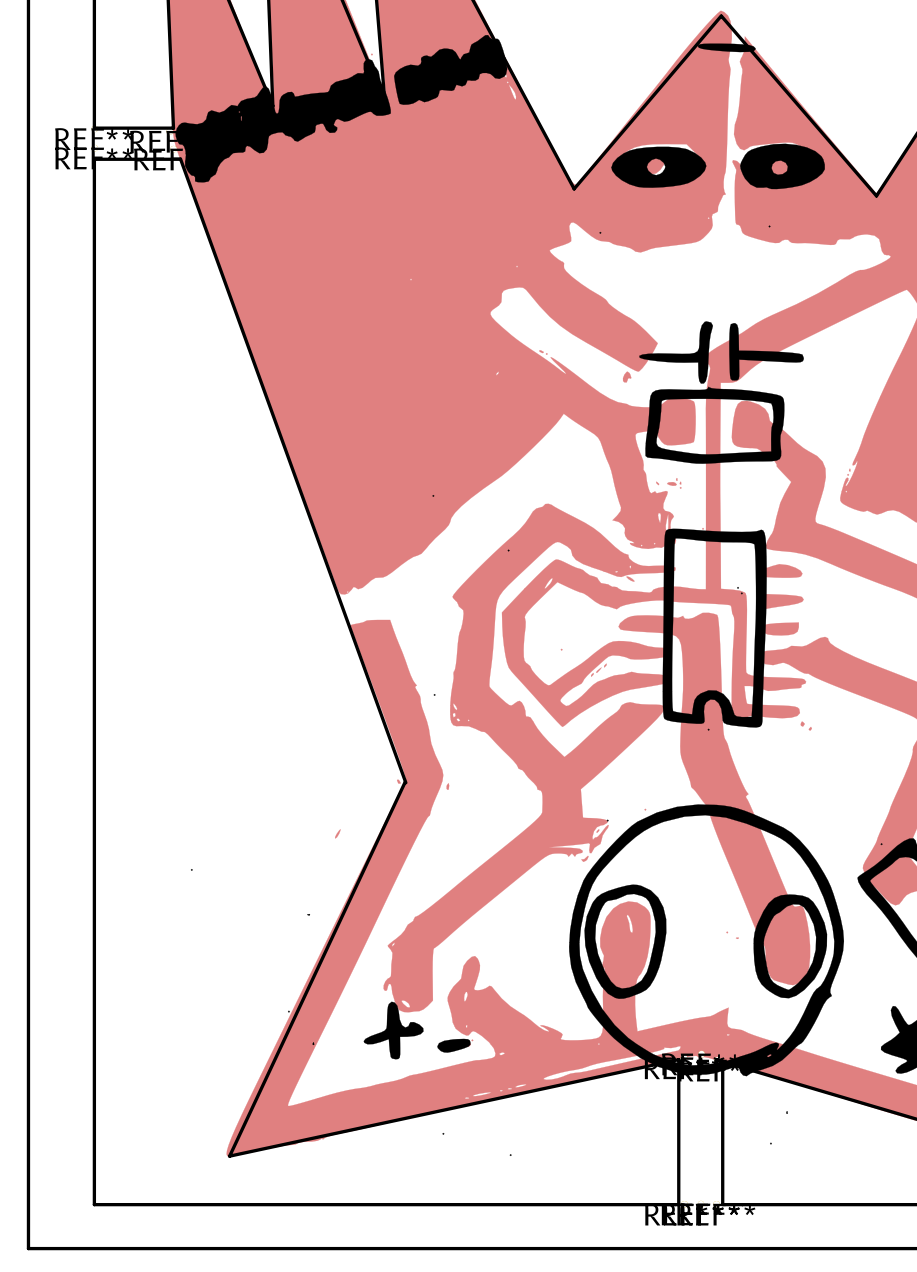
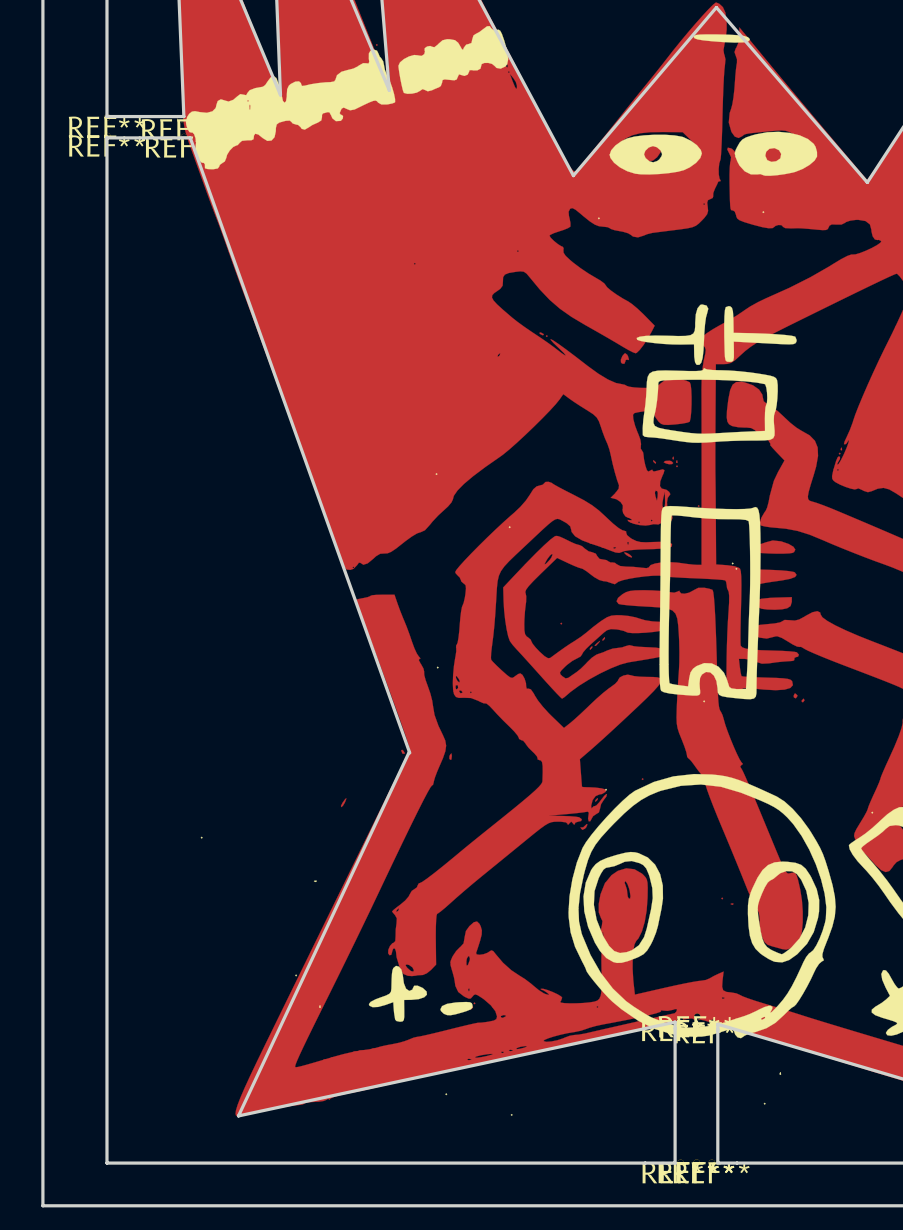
board edge: (94, 159) (180, 159) -> none
board edge: (180, 159) (405, 782) -> (106, 146) (106, 137) (190, 137) (409, 752)

